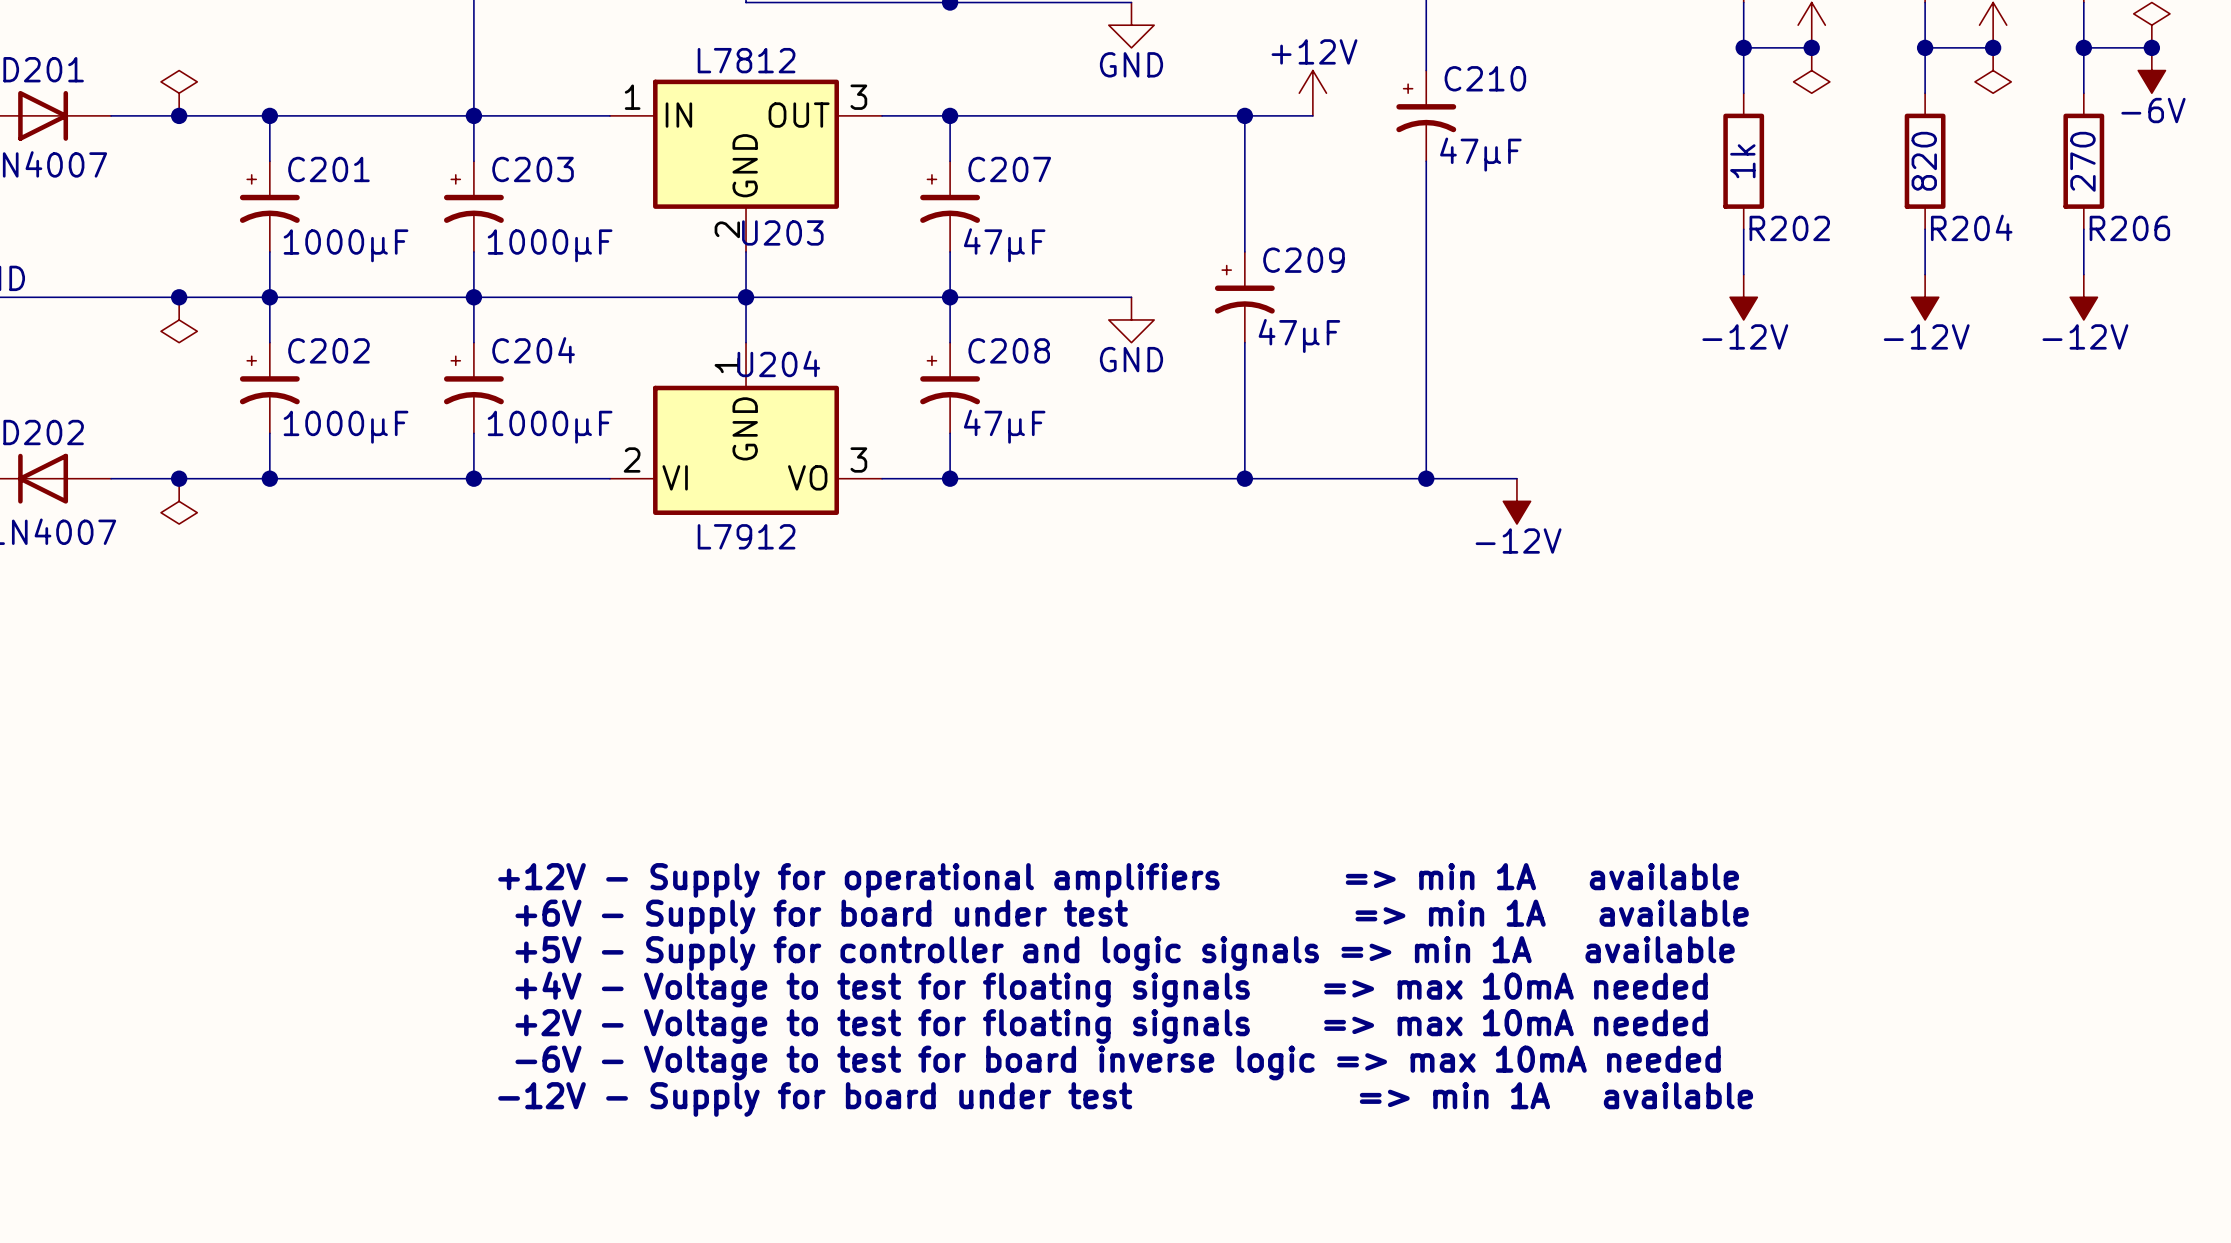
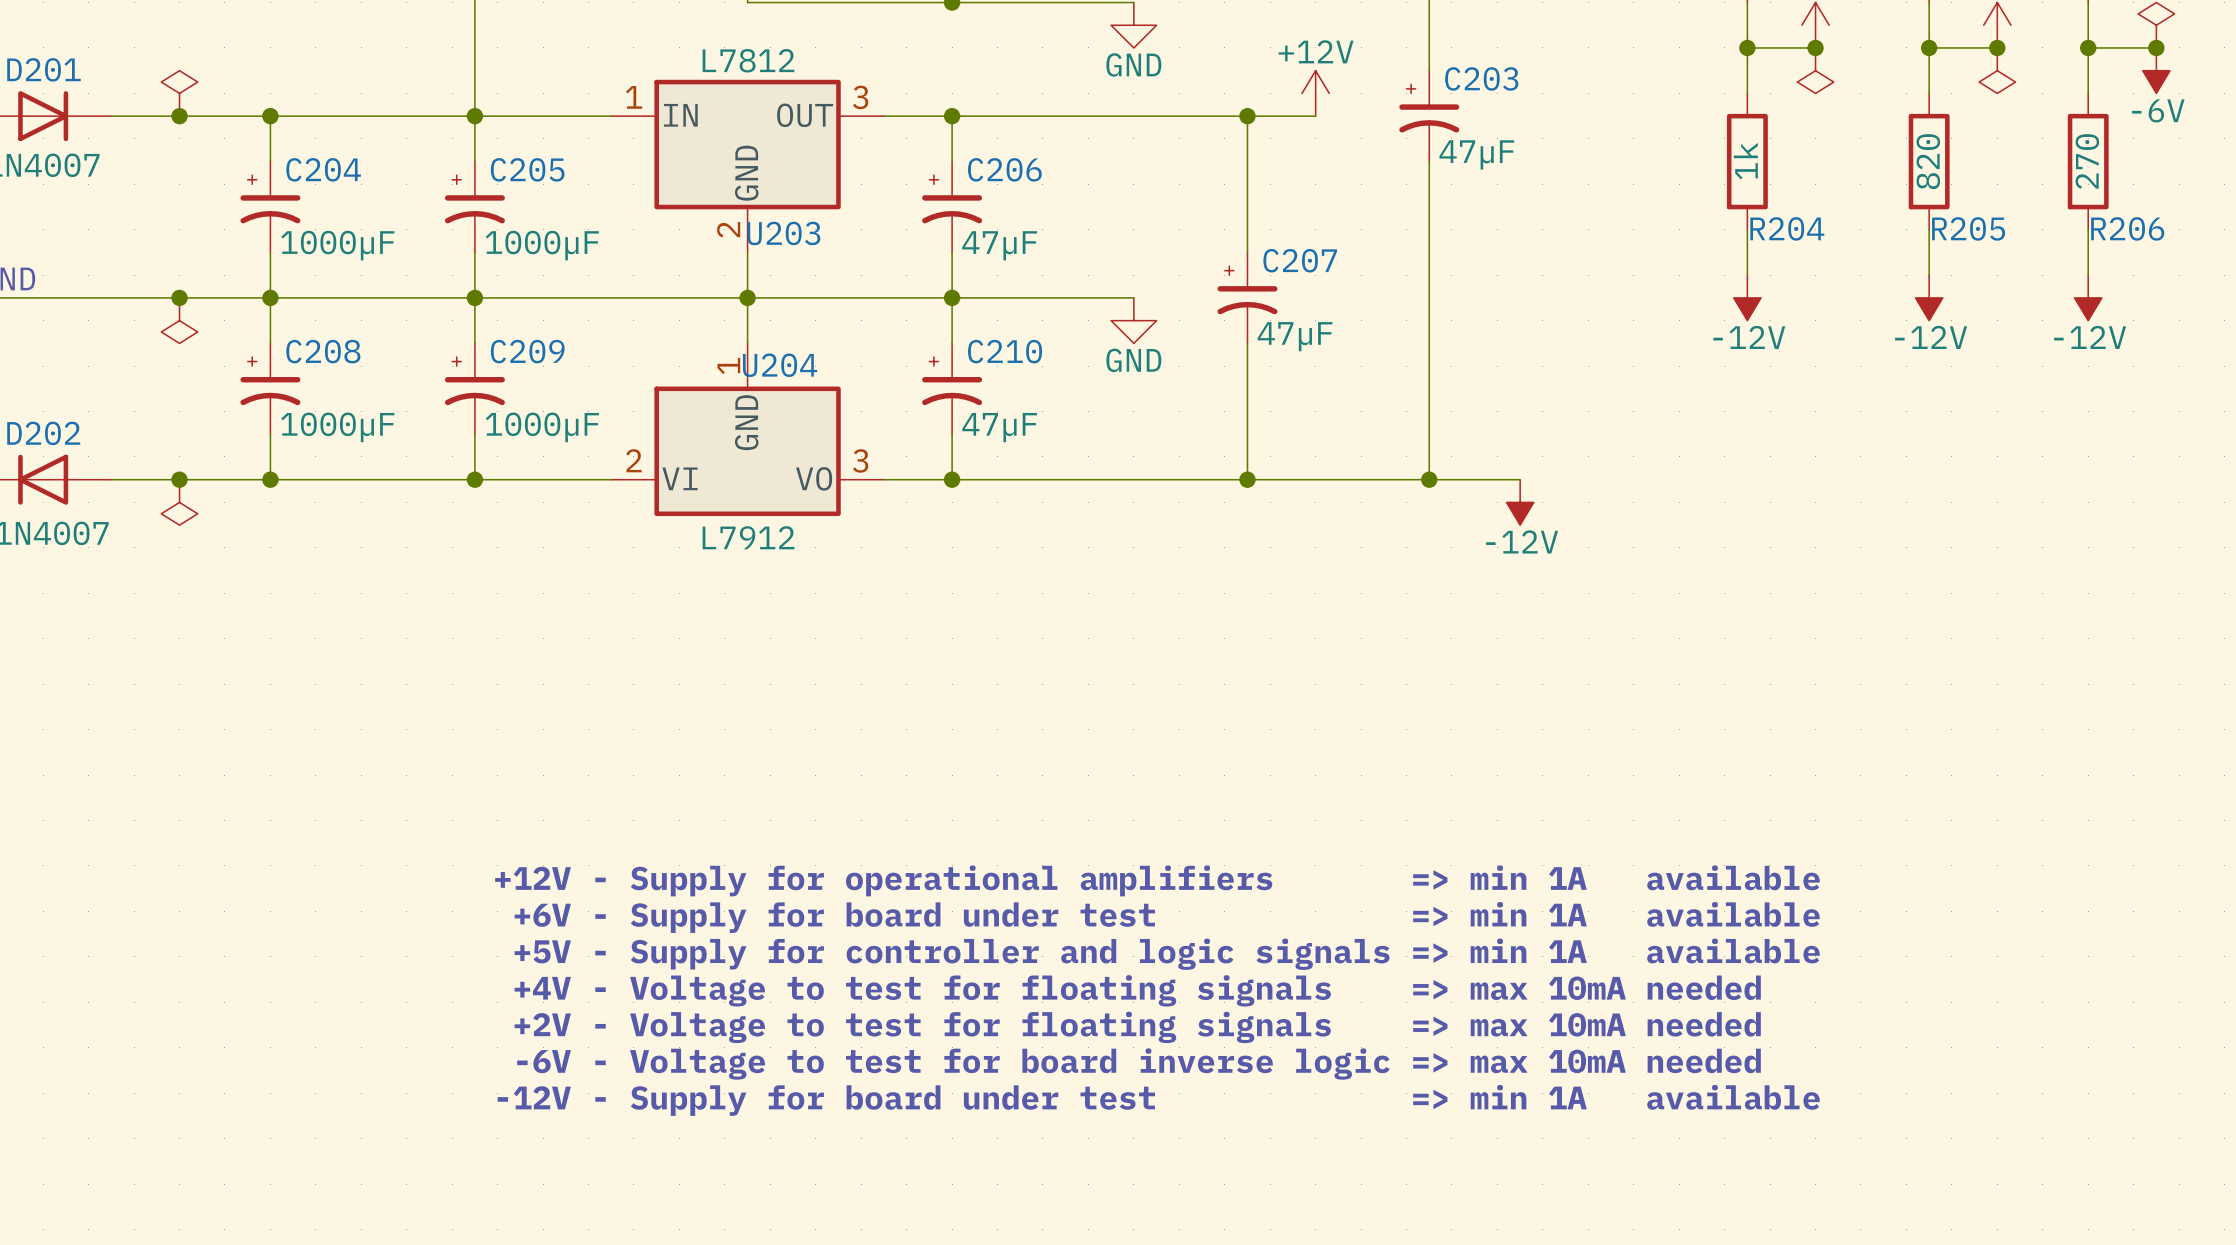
C210 name: C210 (1485, 78) -> C203 (1481, 78)
C201 name: C201 (328, 169) -> C204 (323, 169)
C203 name: C203 (533, 169) -> C205 (527, 169)
C207 name: C207 (1009, 169) -> C206 (1004, 169)
R204 name: R204 (1971, 227) -> R205 (1968, 228)
R202 name: R202 (1789, 228) -> R204 (1787, 228)
C209 name: C209 (1303, 260) -> C207 (1300, 260)
C202 name: C202 (328, 350) -> C208 (323, 351)
C204 name: C204 (533, 350) -> C209 (527, 351)
C208 name: C208 (1009, 350) -> C210 (1005, 351)

